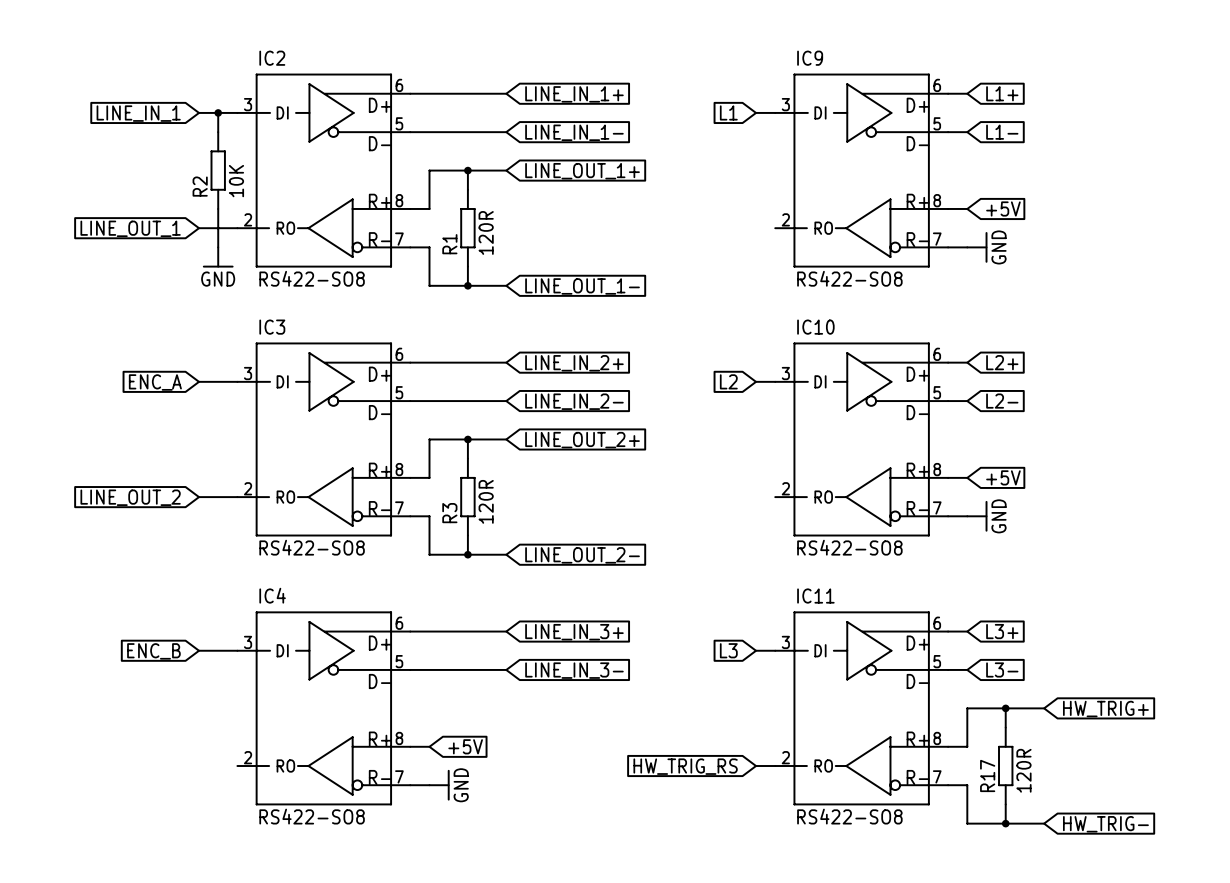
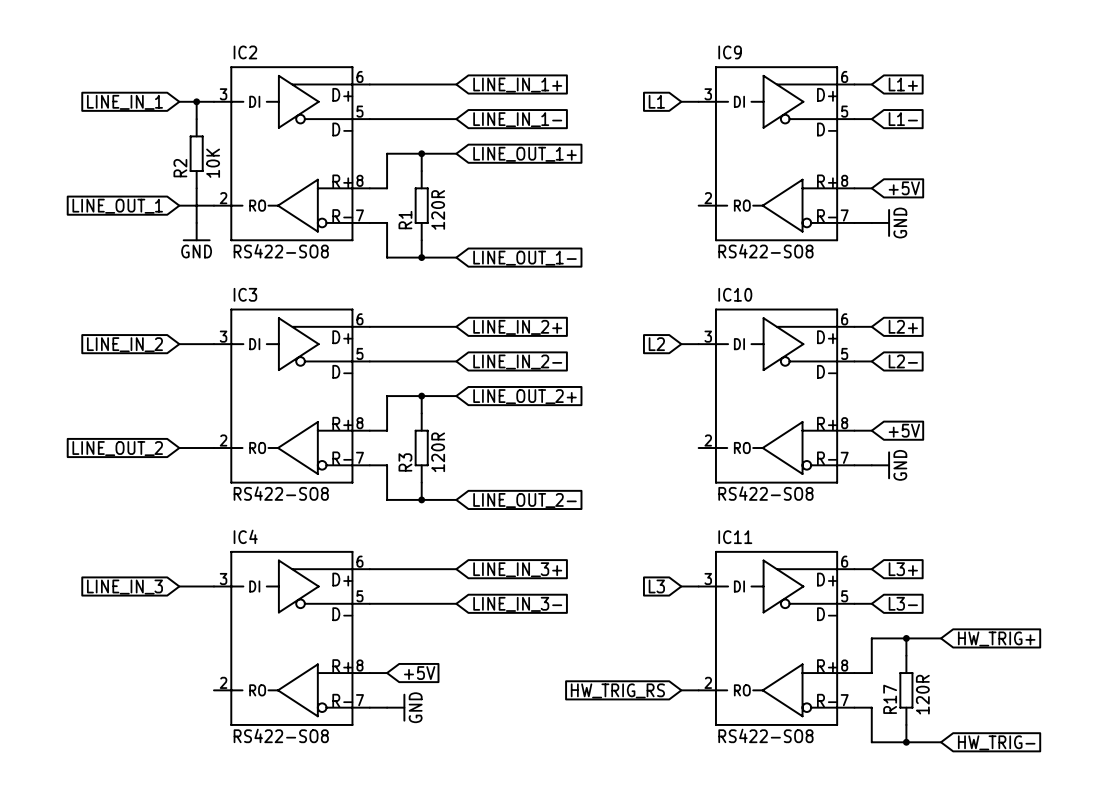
global label: ENC_A (155, 382) -> LINE_IN_2 (124, 344)
global label: ENC_B (153, 651) -> LINE_IN_3 (124, 587)

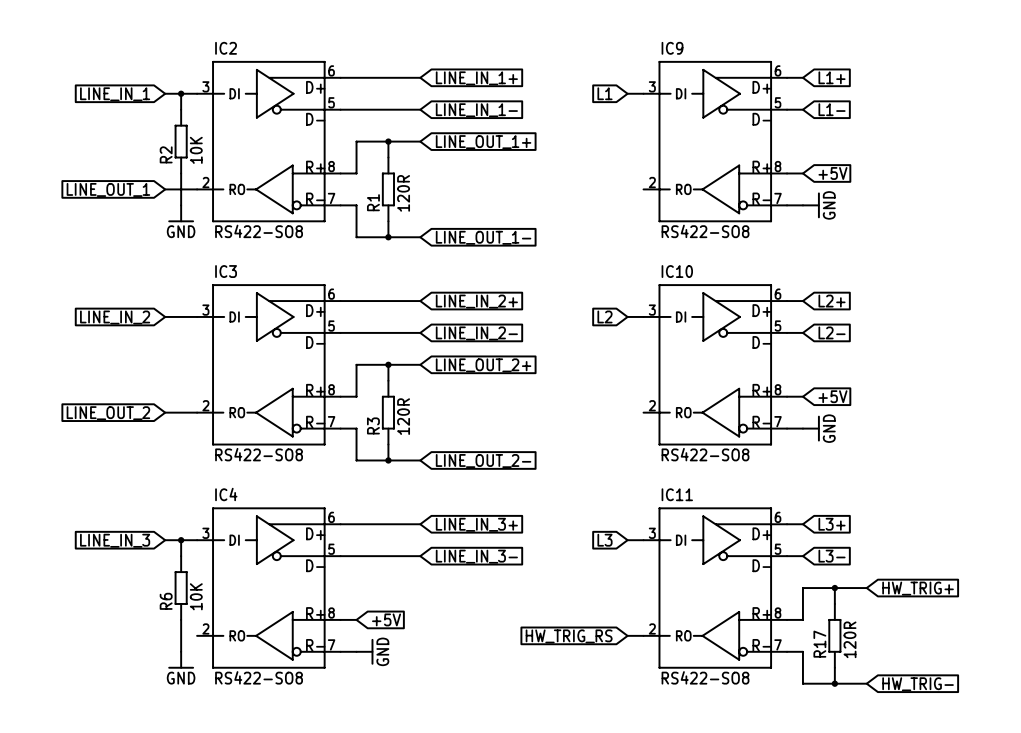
wire: none -> (181, 540) (181, 556)
junction: none -> (181, 540)
R6: none -> 10K (181, 588)
wire: none -> (181, 619) (181, 651)
power symbol: none -> GND (181, 660)

